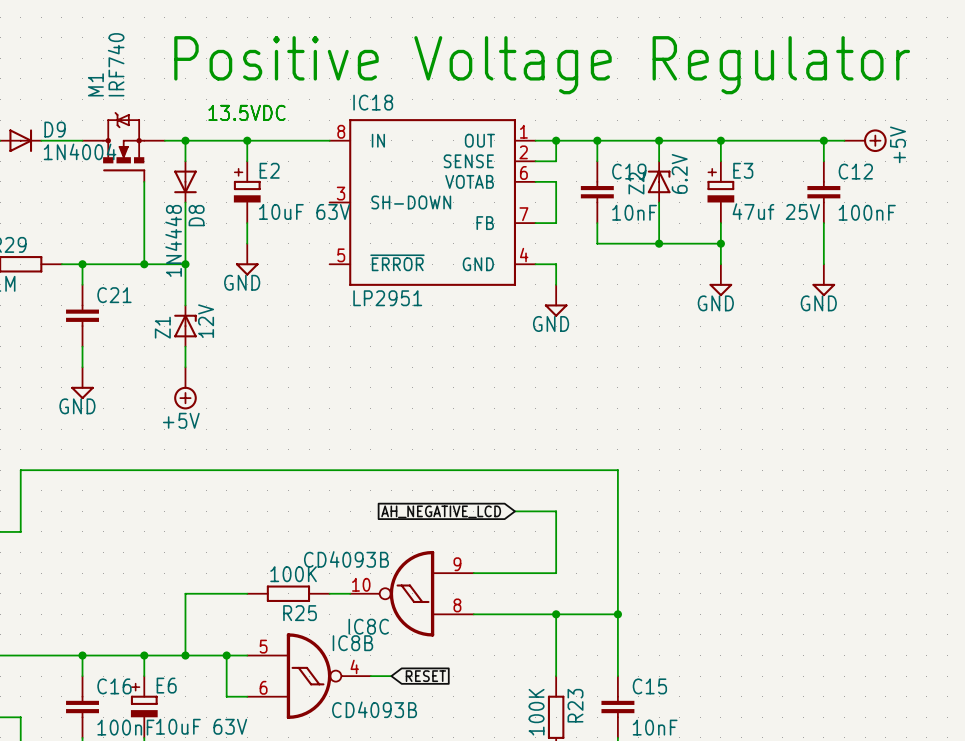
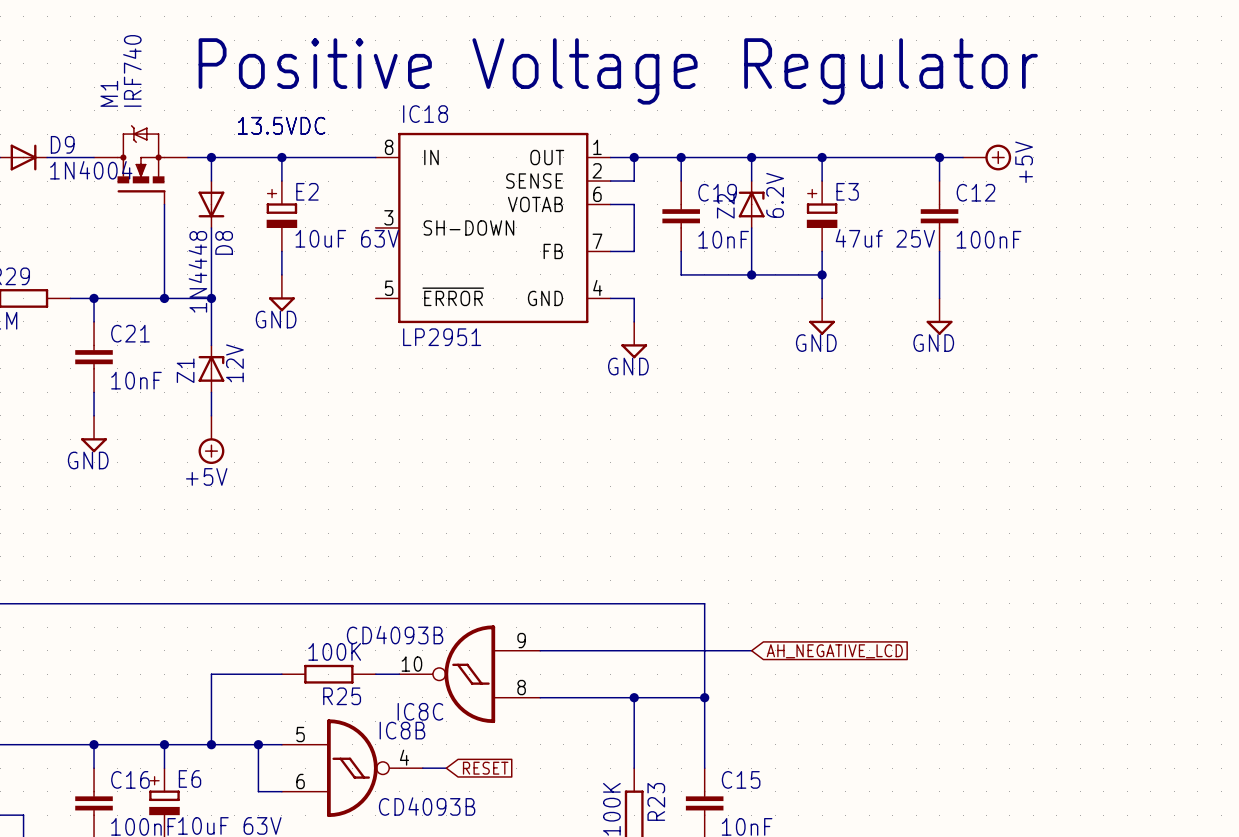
C21 value: none -> 10nF (136, 380)
global label rotation: 0° (441, 511) -> 180° (834, 651)
global label position: AH_NEGATIVE_LCD (441, 511) -> AH_NEGATIVE_LCD (834, 651)
wire: (514, 511) (556, 511) (556, 573) -> (751, 650) (634, 650)
wire: (20, 531) (20, 470) (617, 470) (617, 531) -> (23, 603) (704, 603)

